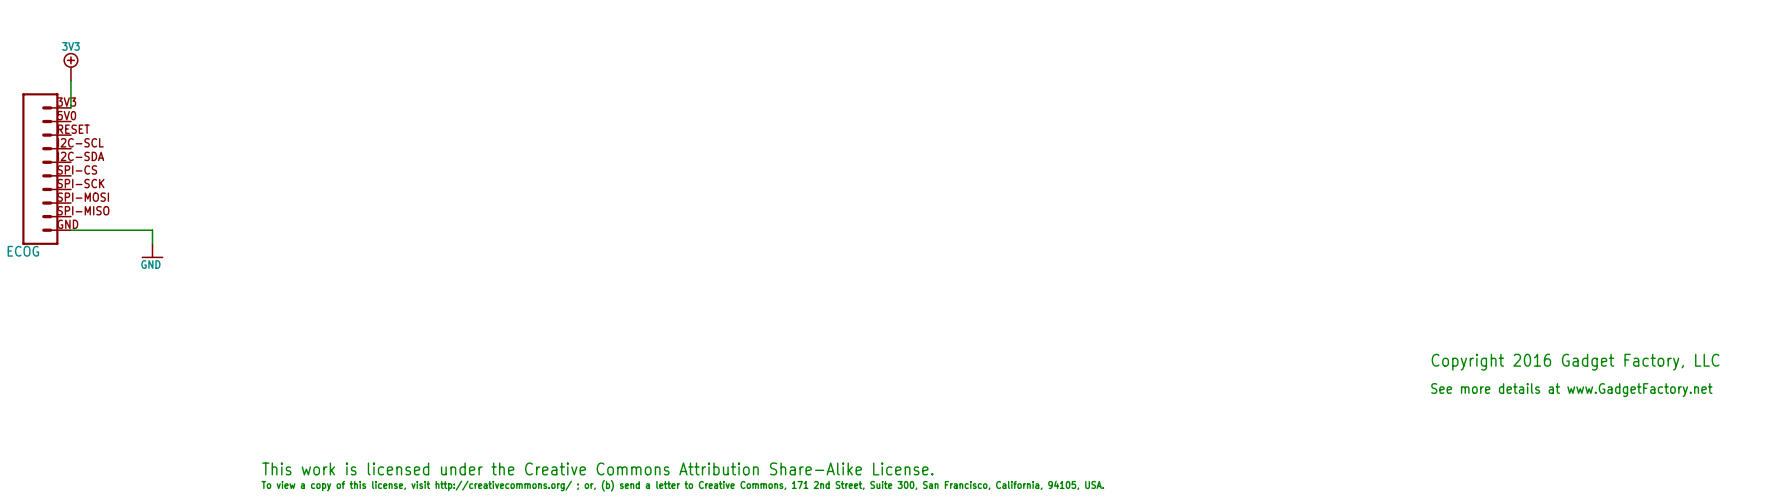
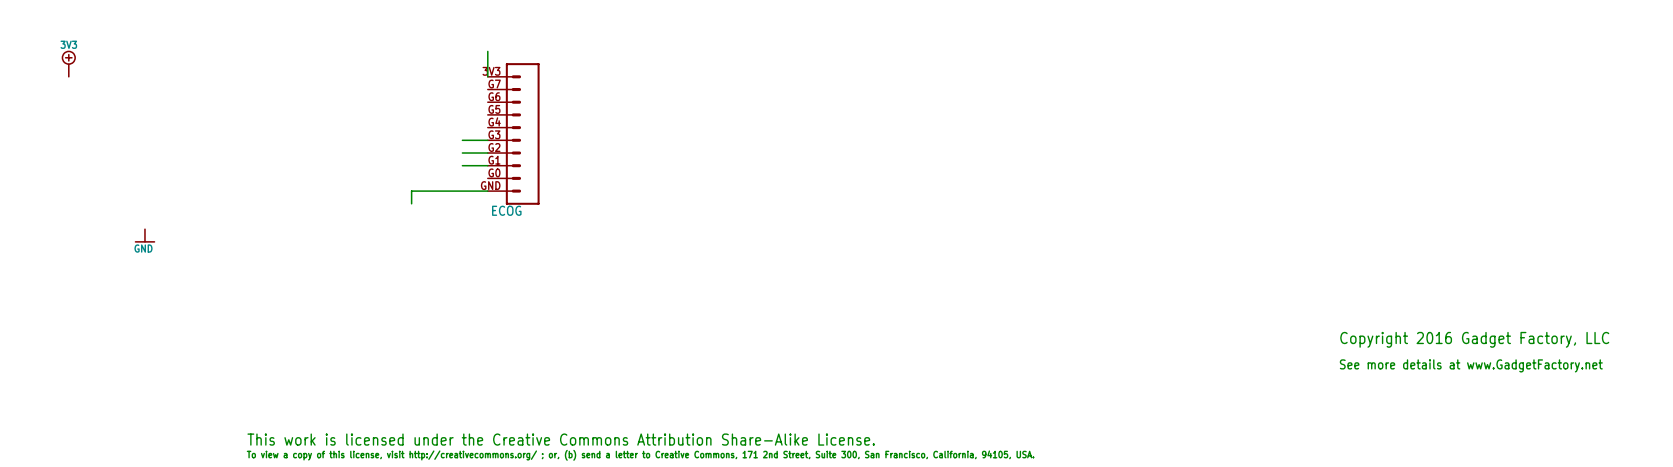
wire: none -> (487, 51) (487, 76)
wire: (70, 80) (70, 107) -> none
ECOG: none -> (513, 133)
wire: none -> (462, 140) (487, 140)
wire: none -> (462, 153) (487, 153)
ECOG: (46, 169) -> none
wire: none -> (462, 165) (487, 165)
wire: none -> (487, 191) (411, 191) (411, 203)
wire: (70, 230) (152, 230) (152, 243) -> none

